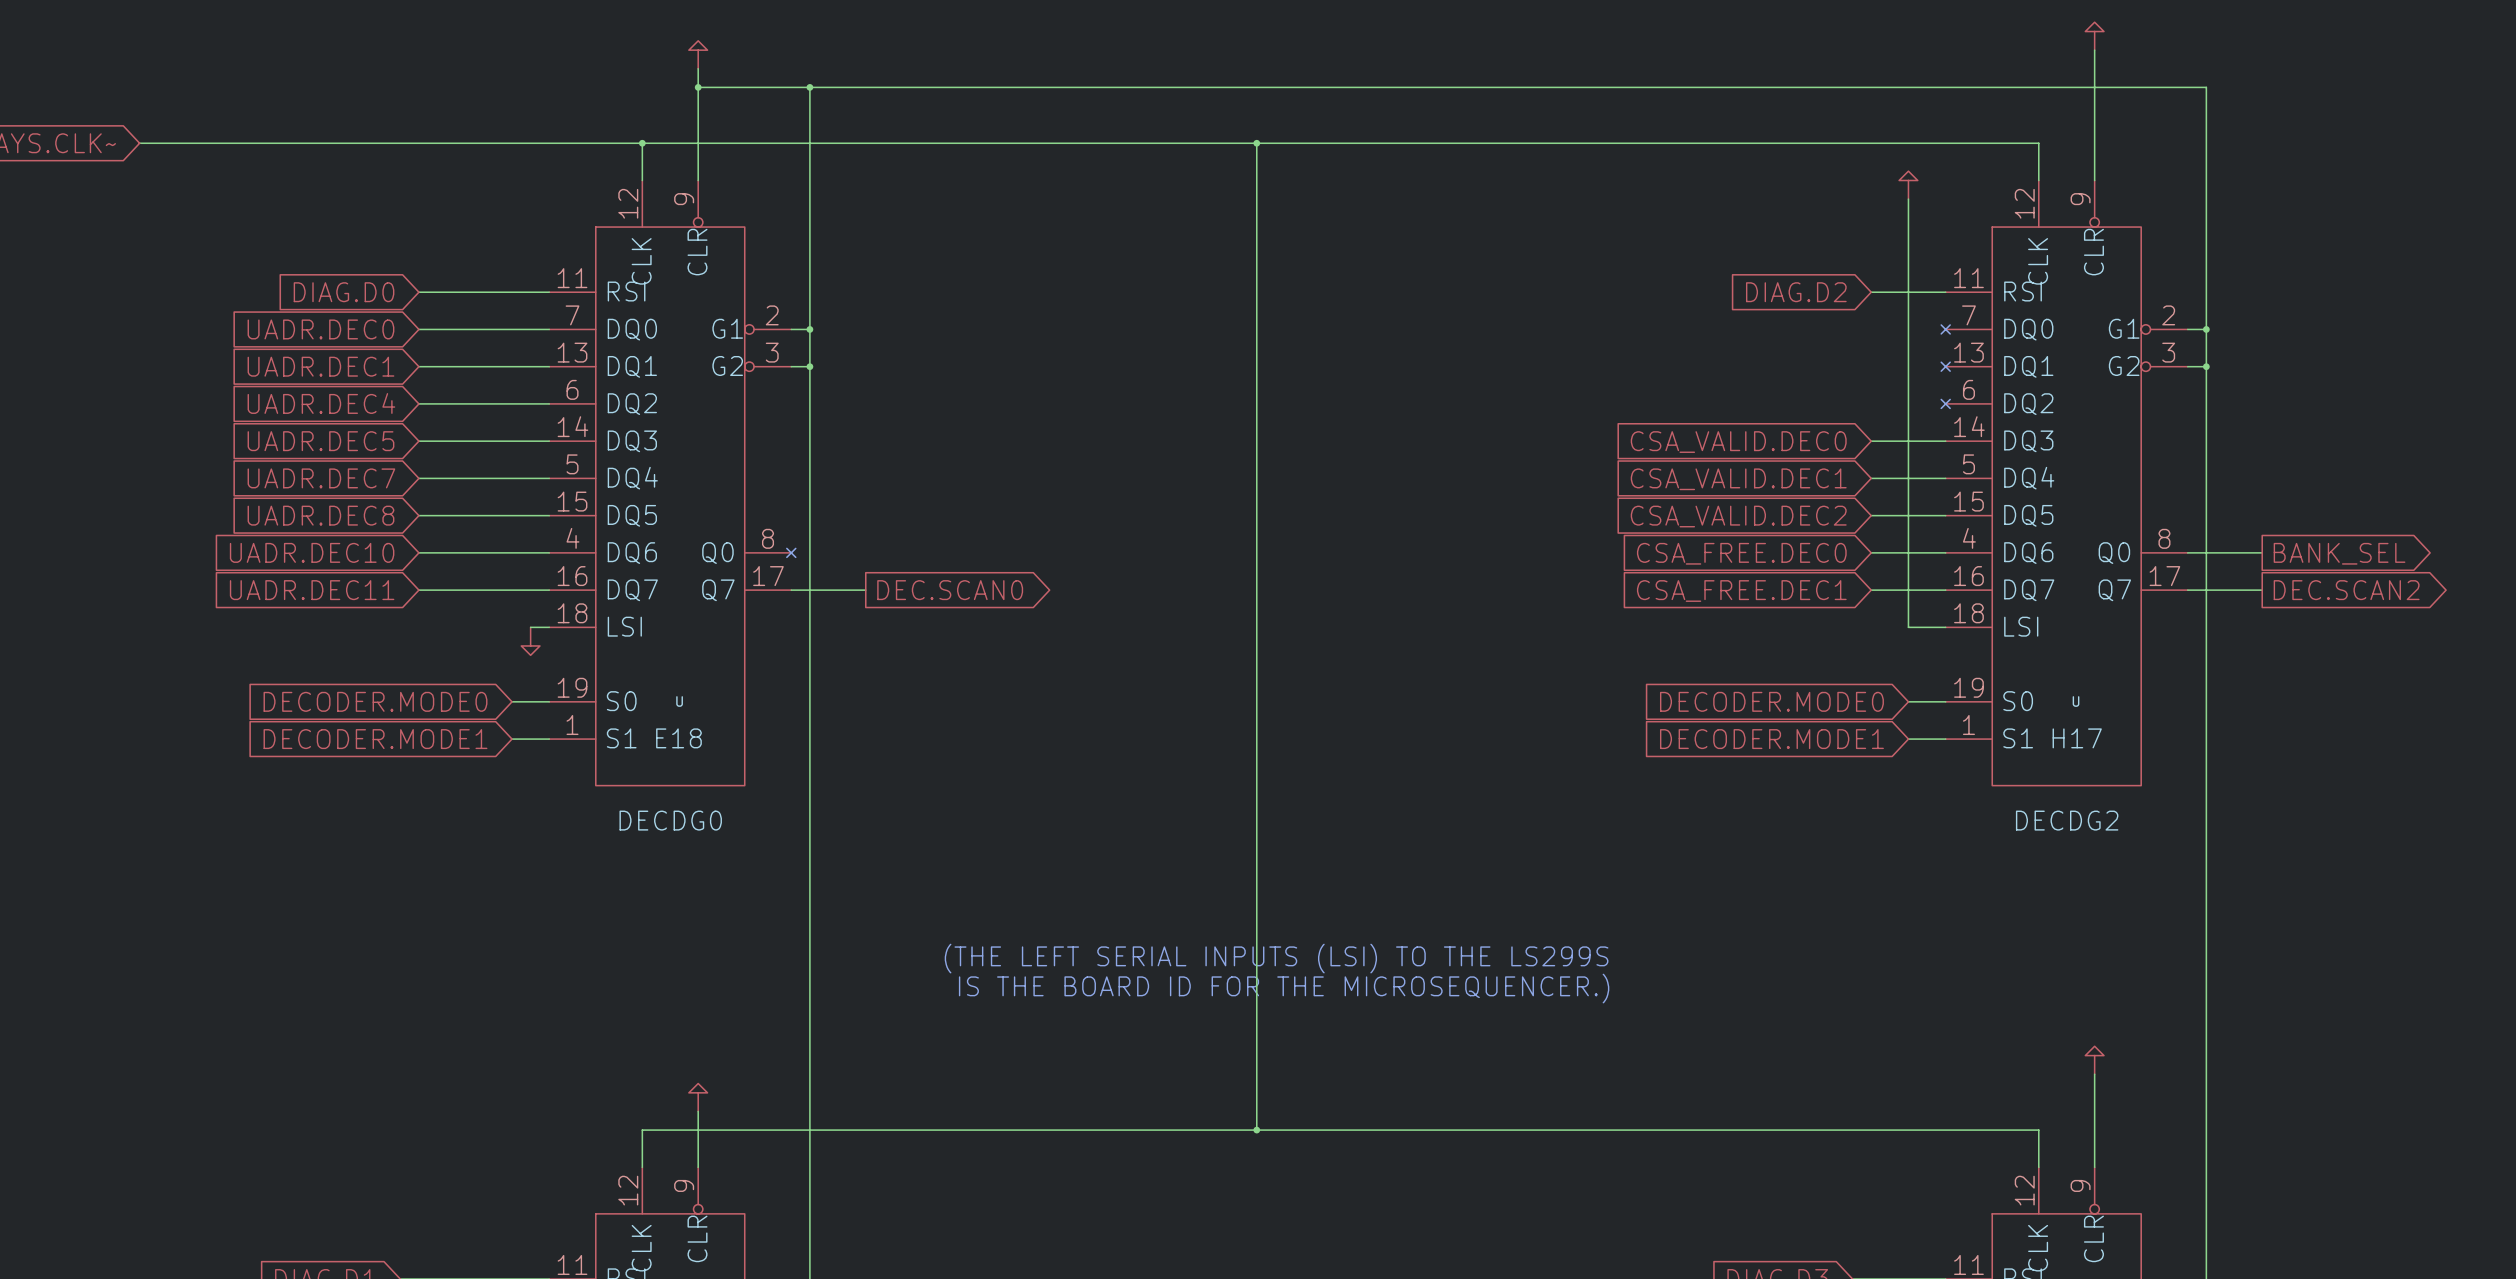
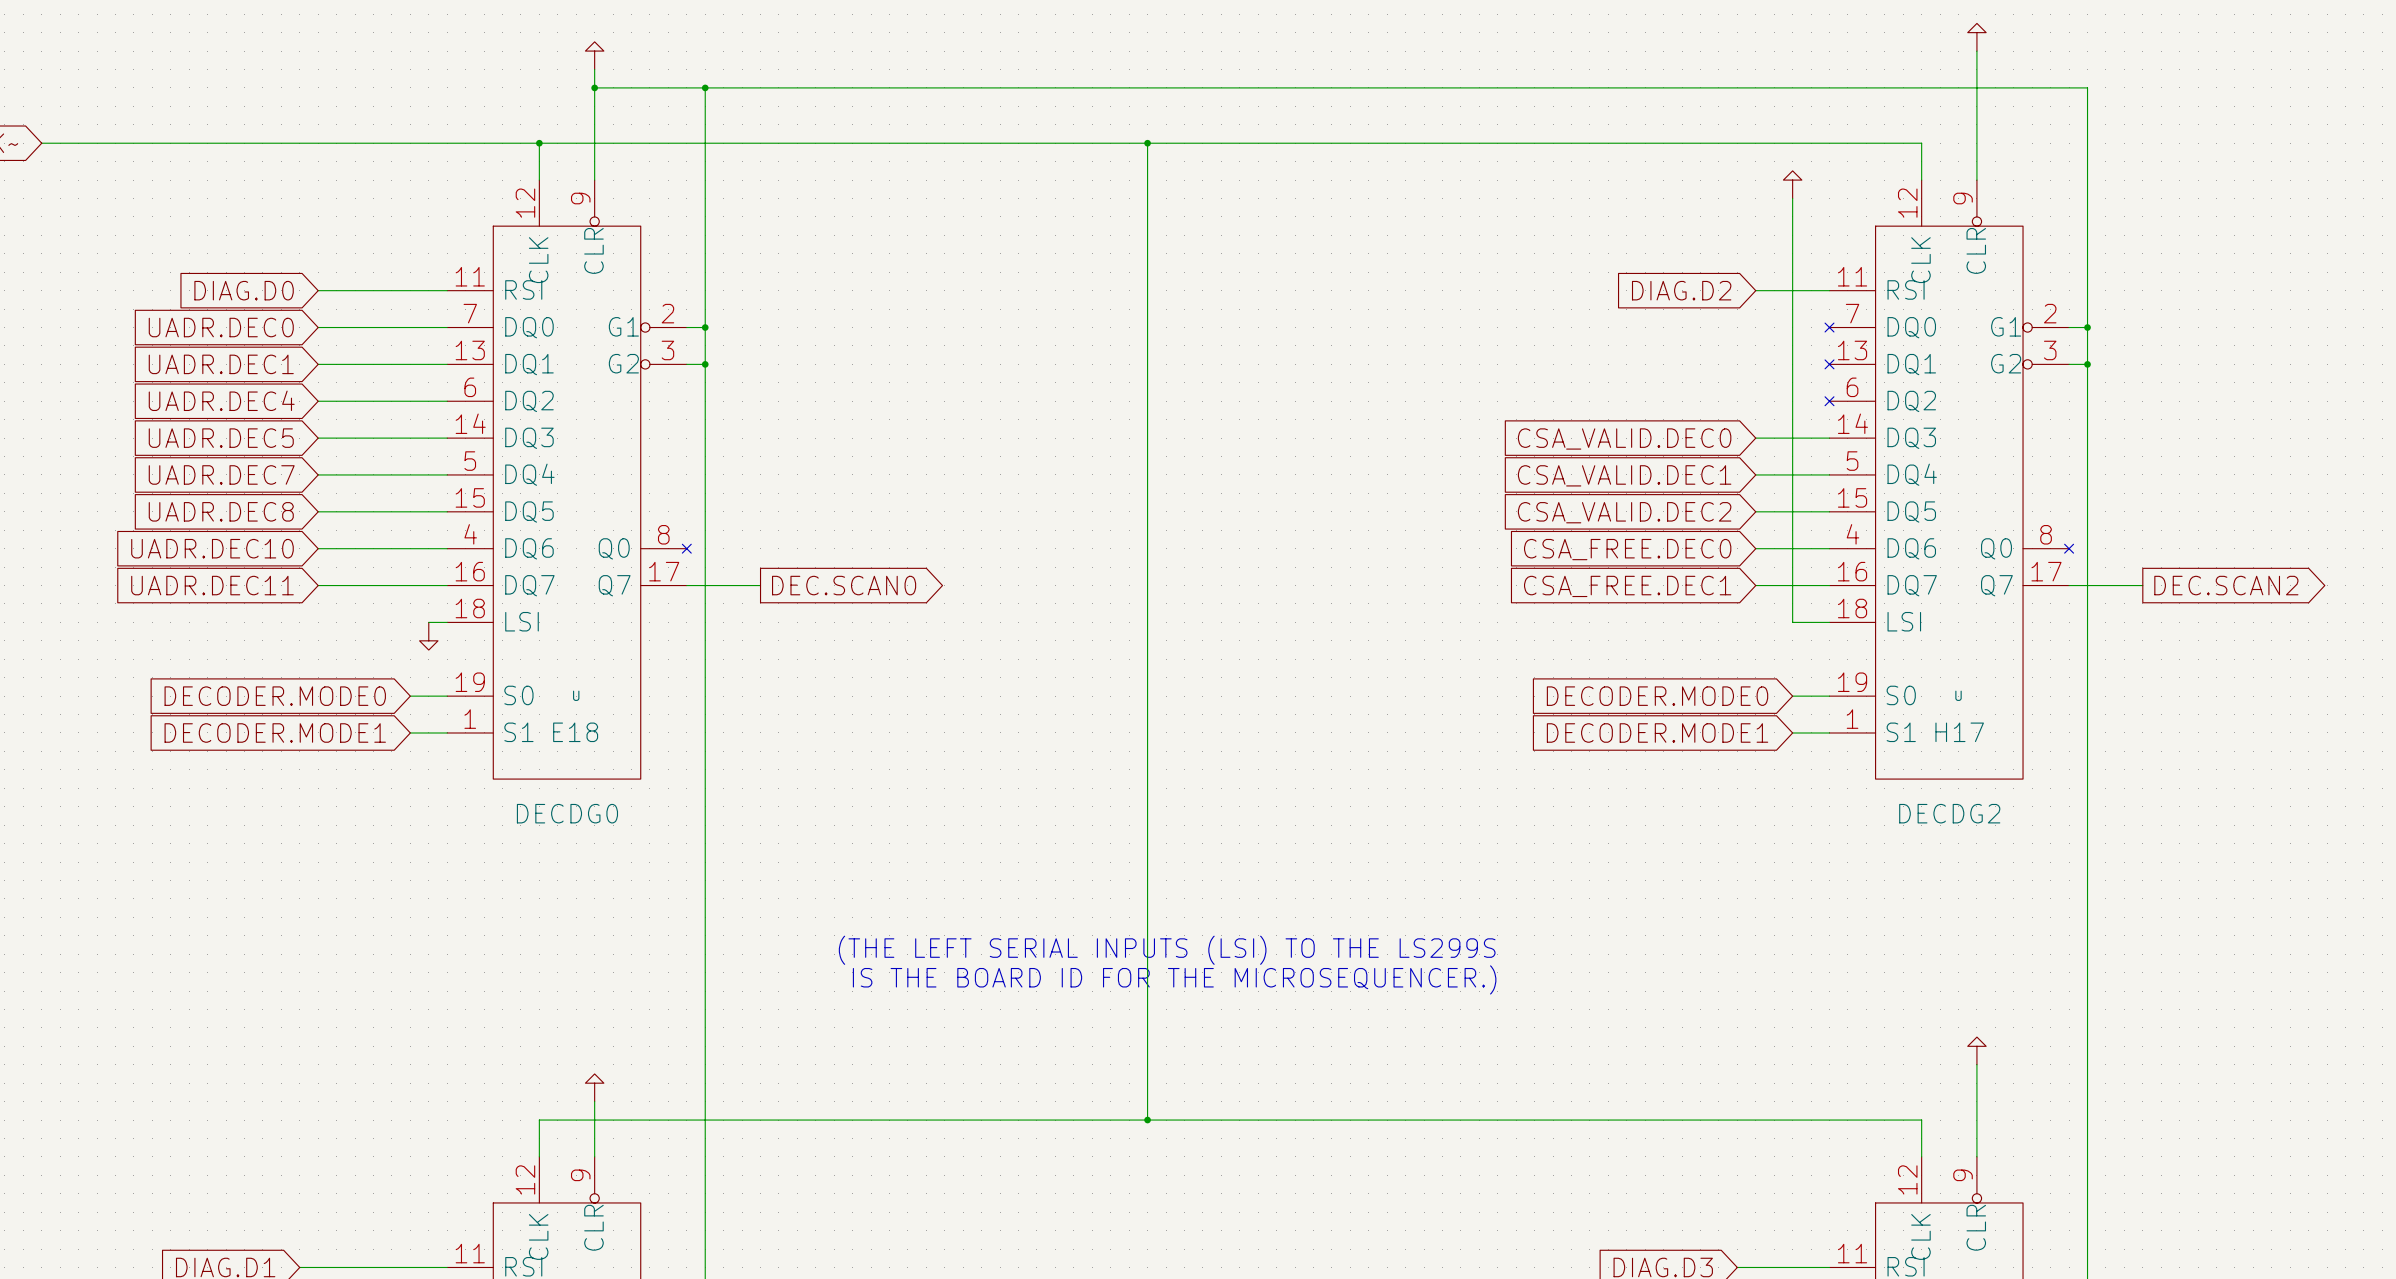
wire: (2187, 552) (2262, 552) -> none
no-connect mark: none -> (2069, 548)
global label: BANK_SEL (2339, 553) -> none

